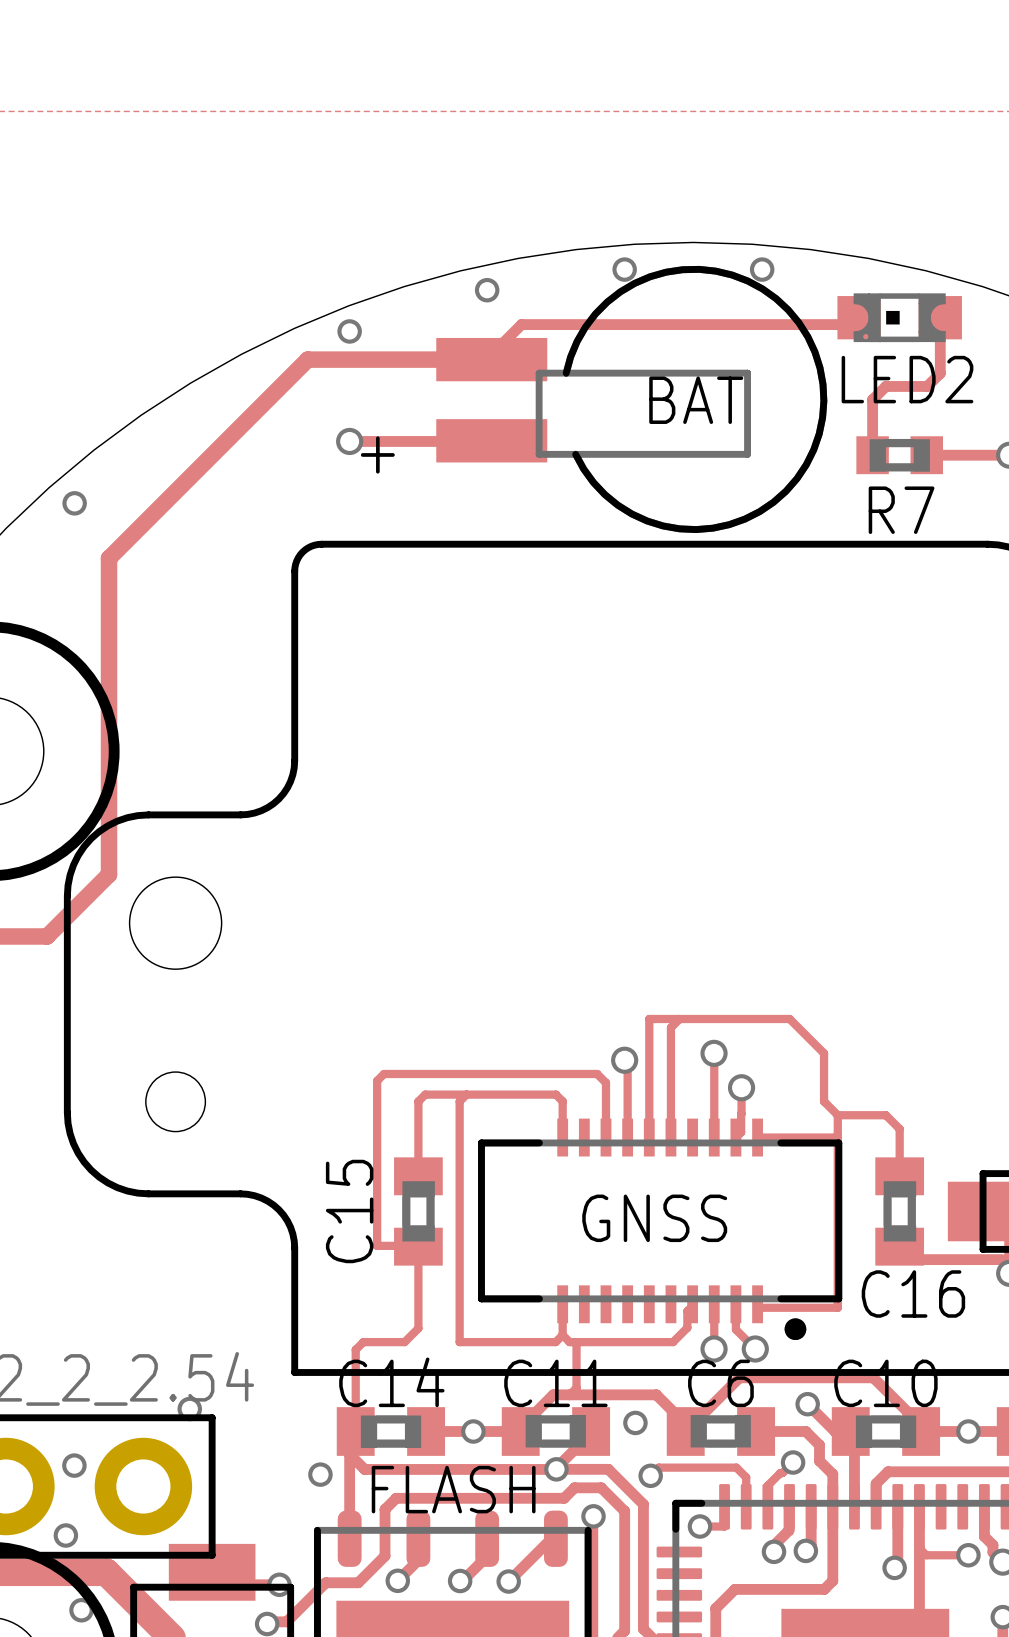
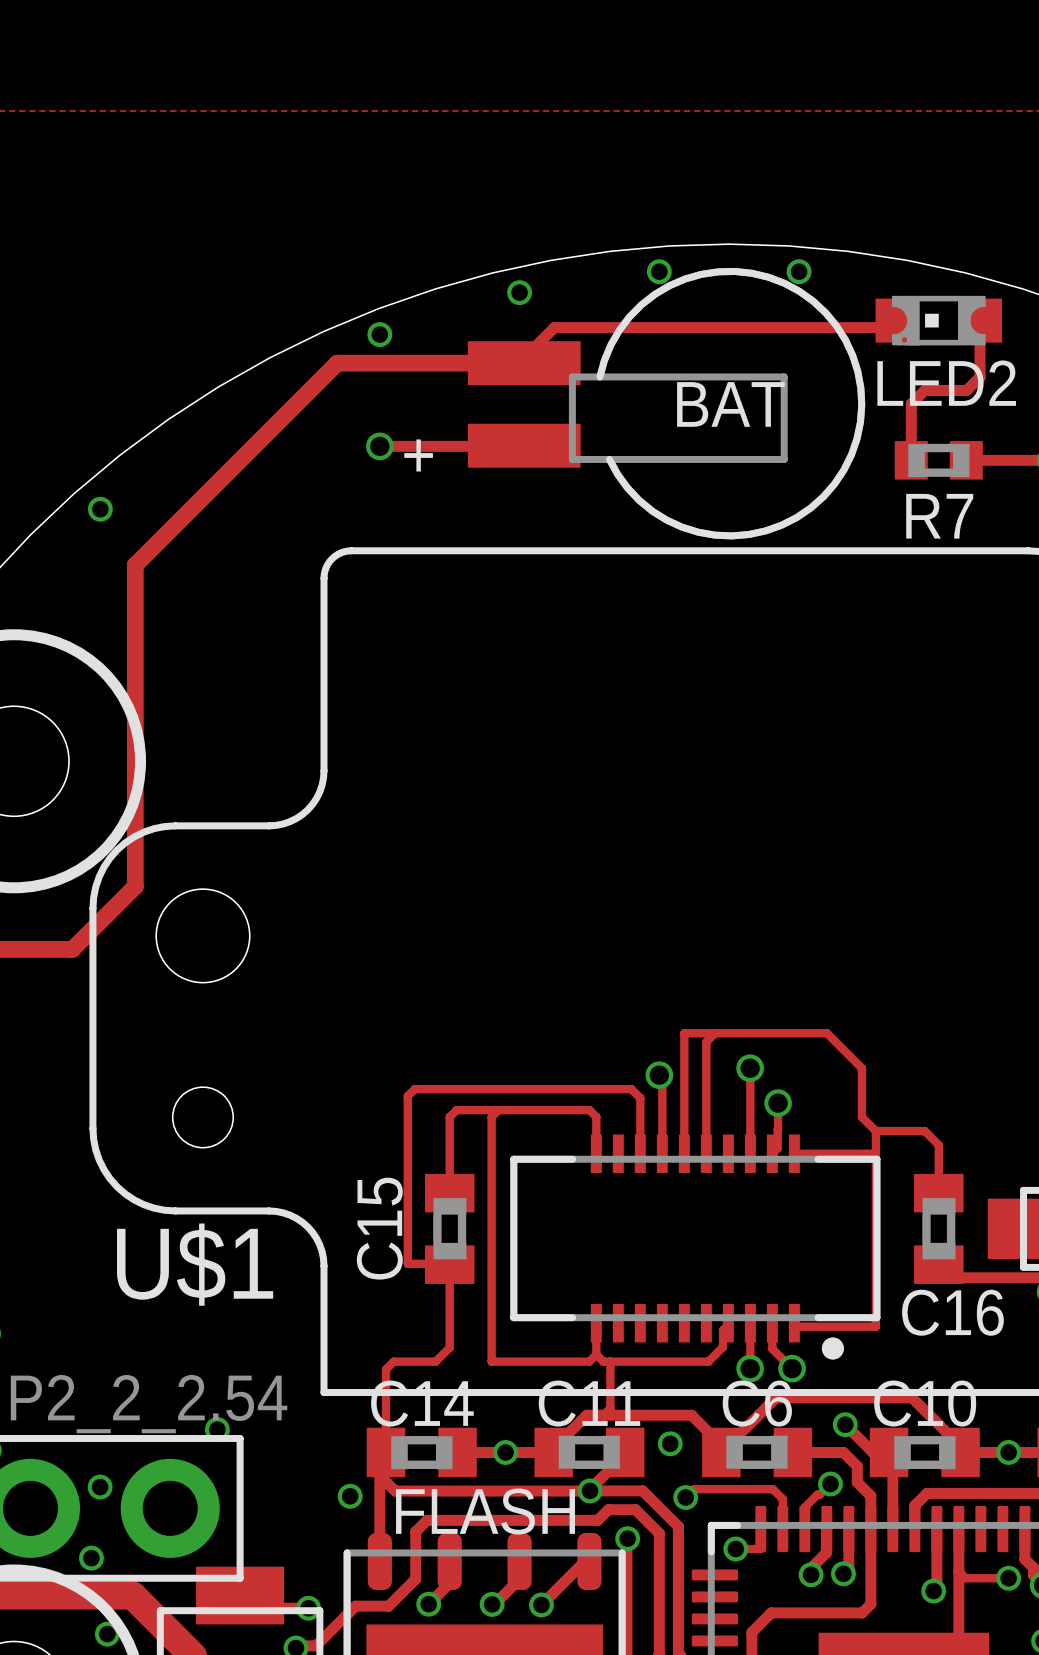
GNSS name: GNSS (654, 1218) -> U$1 (195, 1264)

